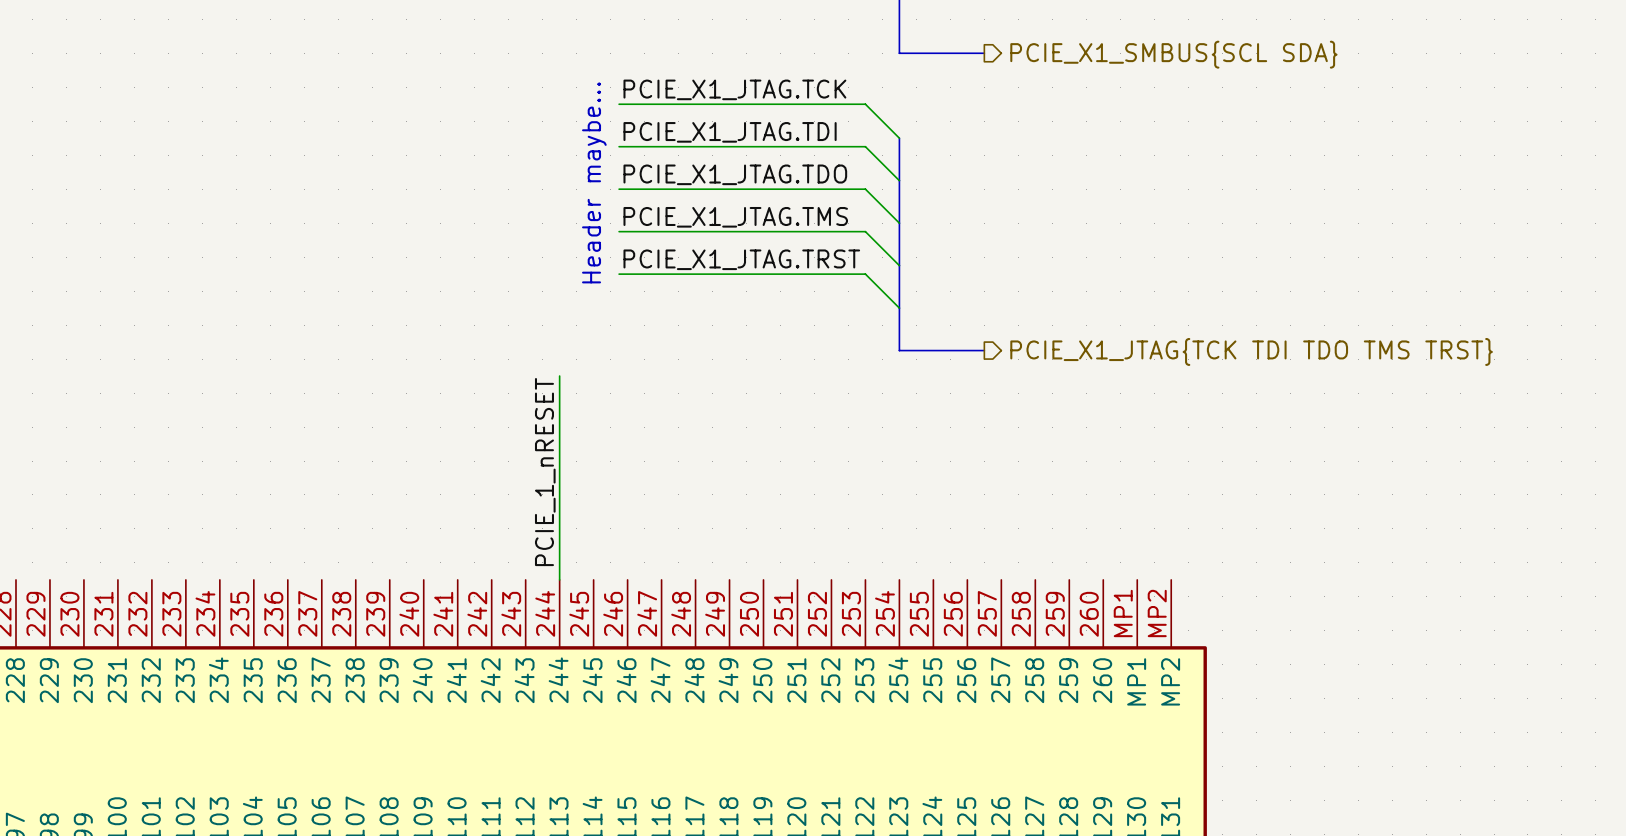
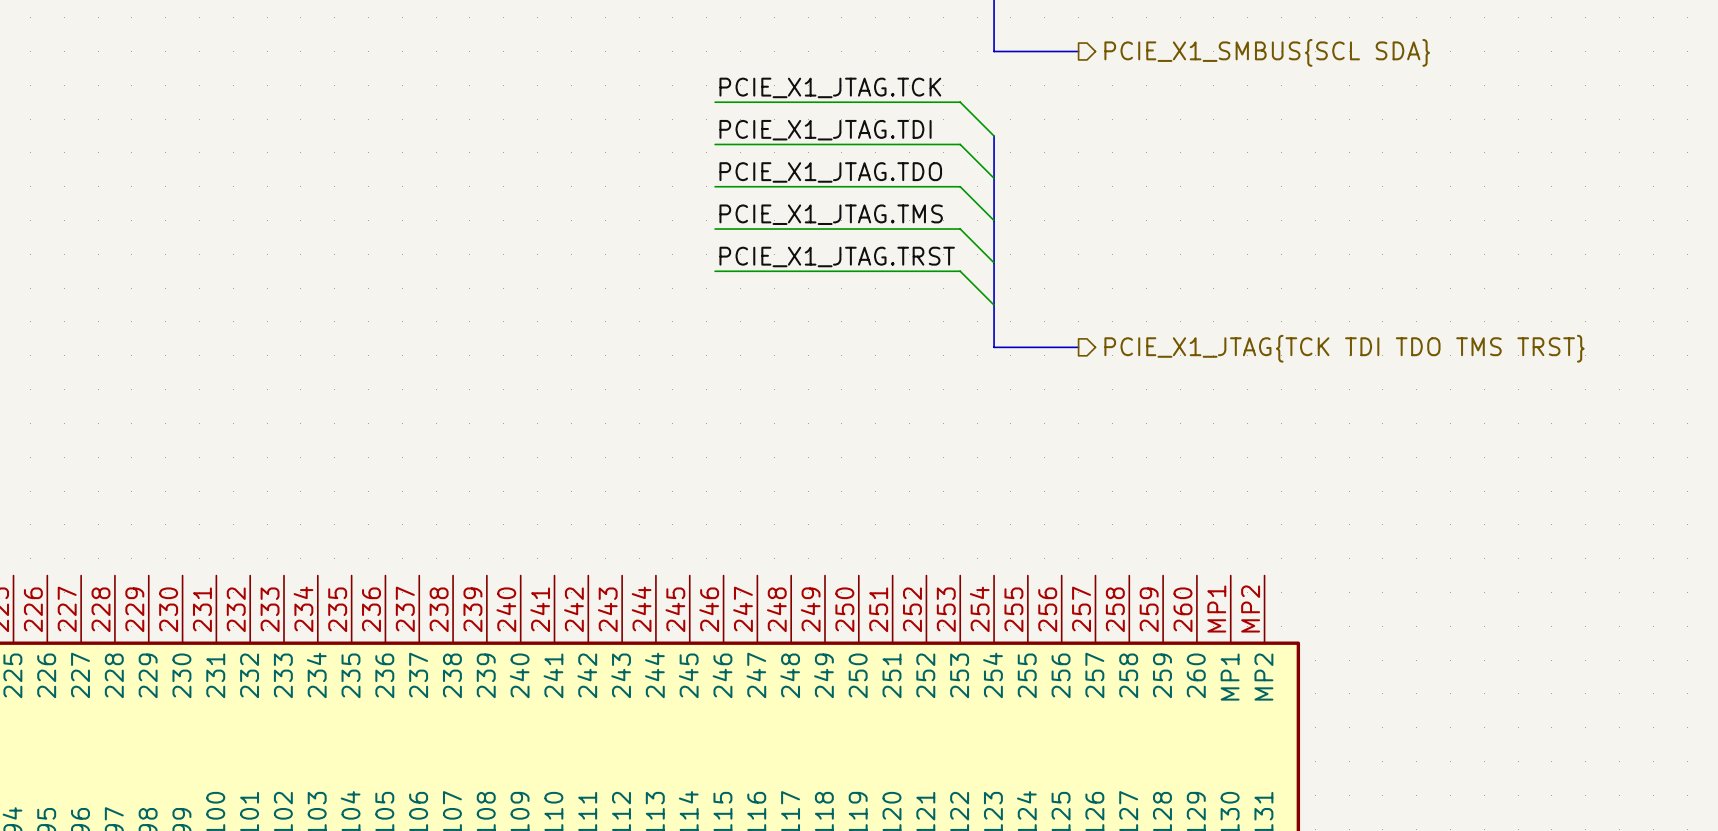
text: Header maybe... (594, 182) -> none
wire: (559, 376) (559, 579) -> none
label: PCIE_1_nRESET (545, 472) -> none

